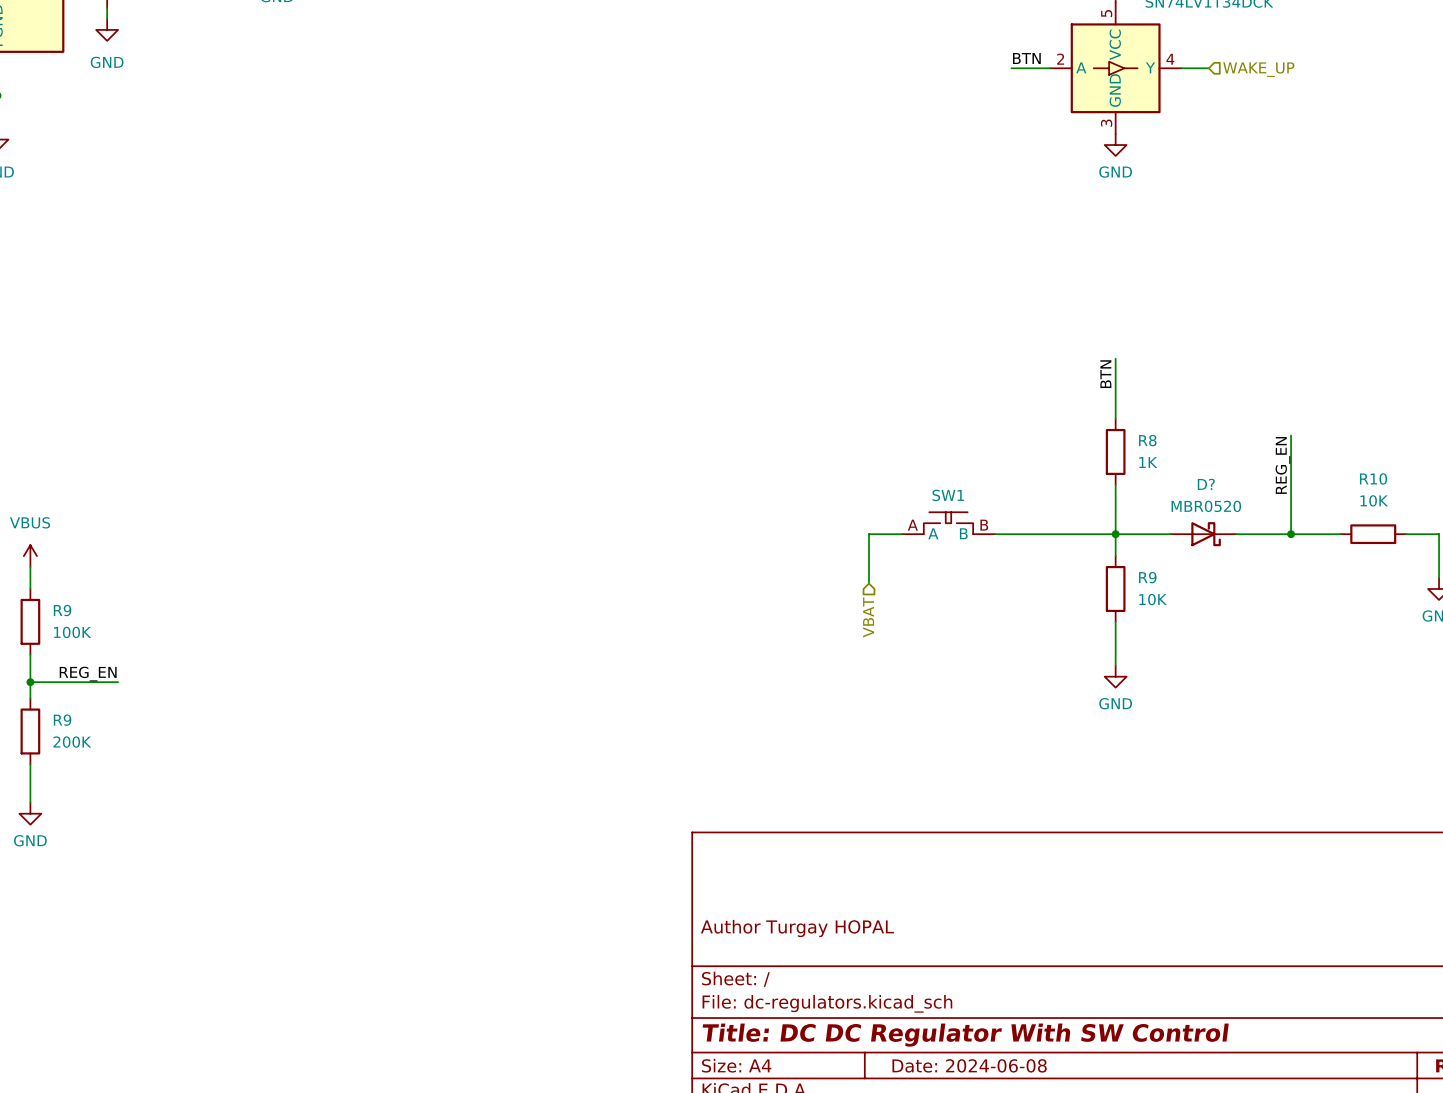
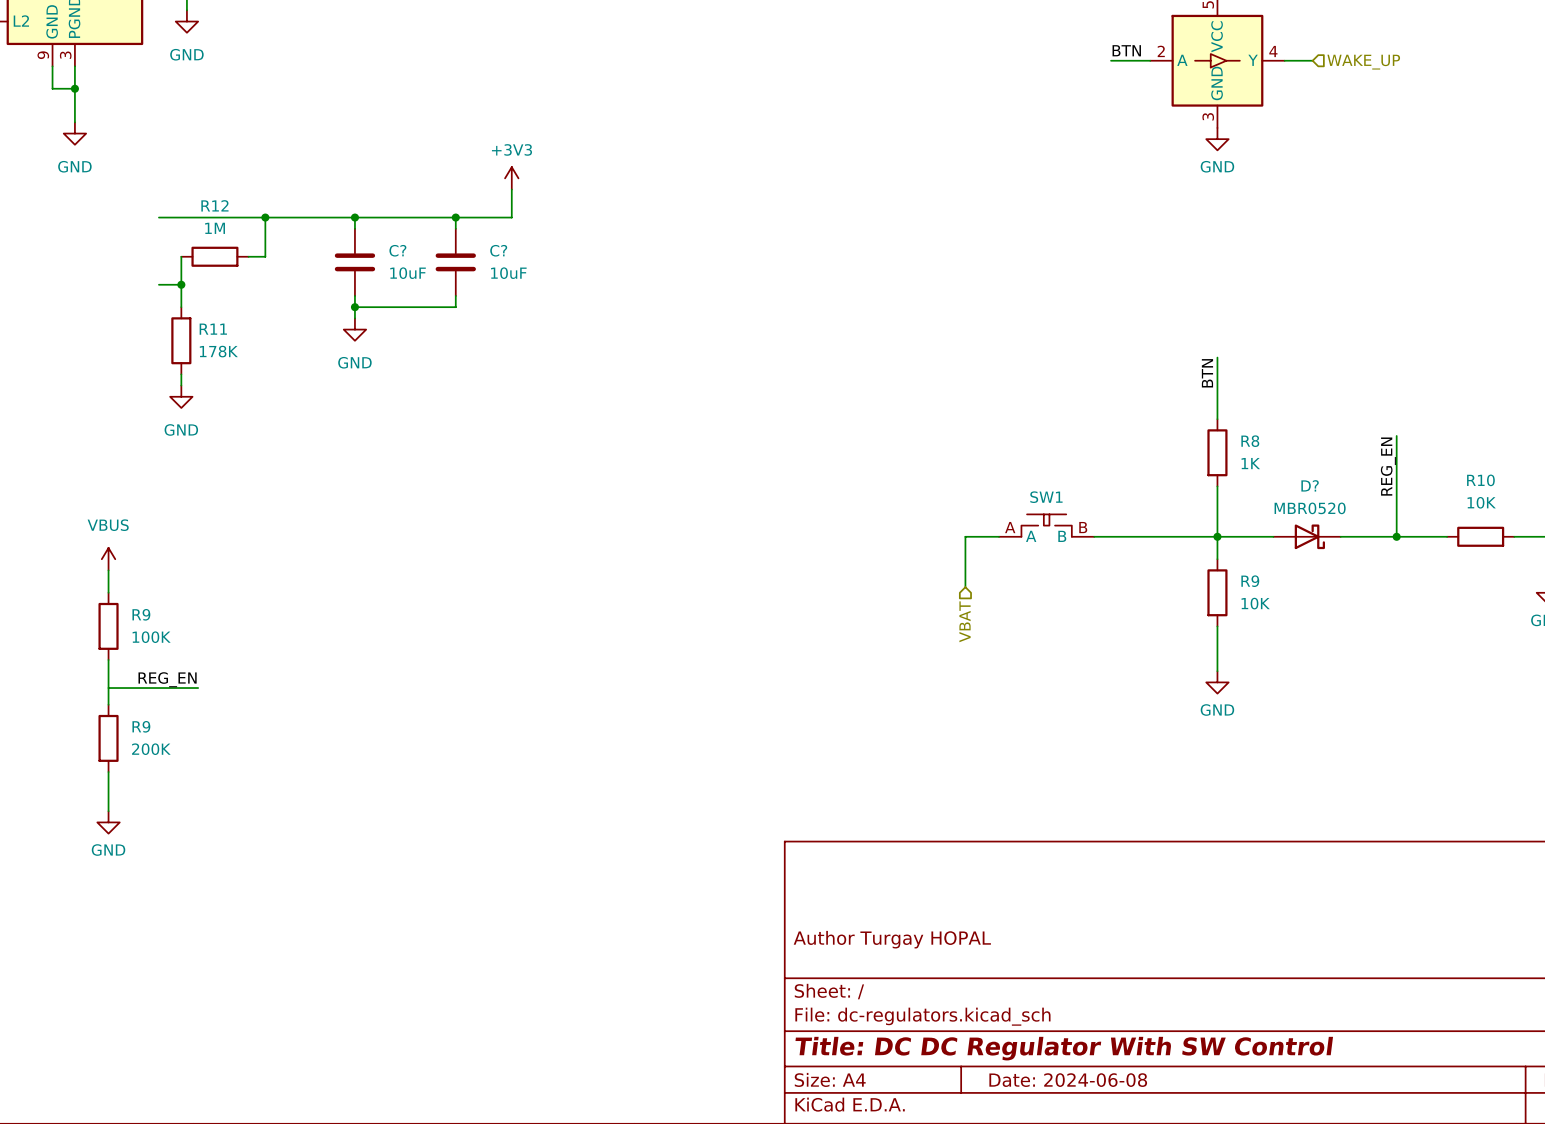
power symbol: none -> +3V3 (511, 178)
wire: none -> (511, 189) (511, 217) (158, 217)
wire: none -> (265, 217) (265, 256) (248, 256)
junction: none -> (265, 217)
wire: none -> (354, 217) (354, 228)
junction: none -> (354, 217)
wire: none -> (455, 217) (455, 228)
junction: none -> (455, 217)
wire: none -> (181, 256) (181, 307)
R12: none -> 1M (214, 256)
C?: none -> 10uF (354, 262)
C?: none -> 10uF (455, 262)
wire: none -> (158, 284) (181, 284)
junction: none -> (181, 284)
wire: none -> (354, 295) (354, 318)
wire: none -> (455, 295) (455, 307) (354, 307)
junction: none -> (354, 307)
power symbol: none -> GND (354, 329)
R11: none -> 178K (181, 340)
wire: none -> (181, 374) (181, 385)
power symbol: none -> GND (181, 396)
junction: (30, 682) -> none

